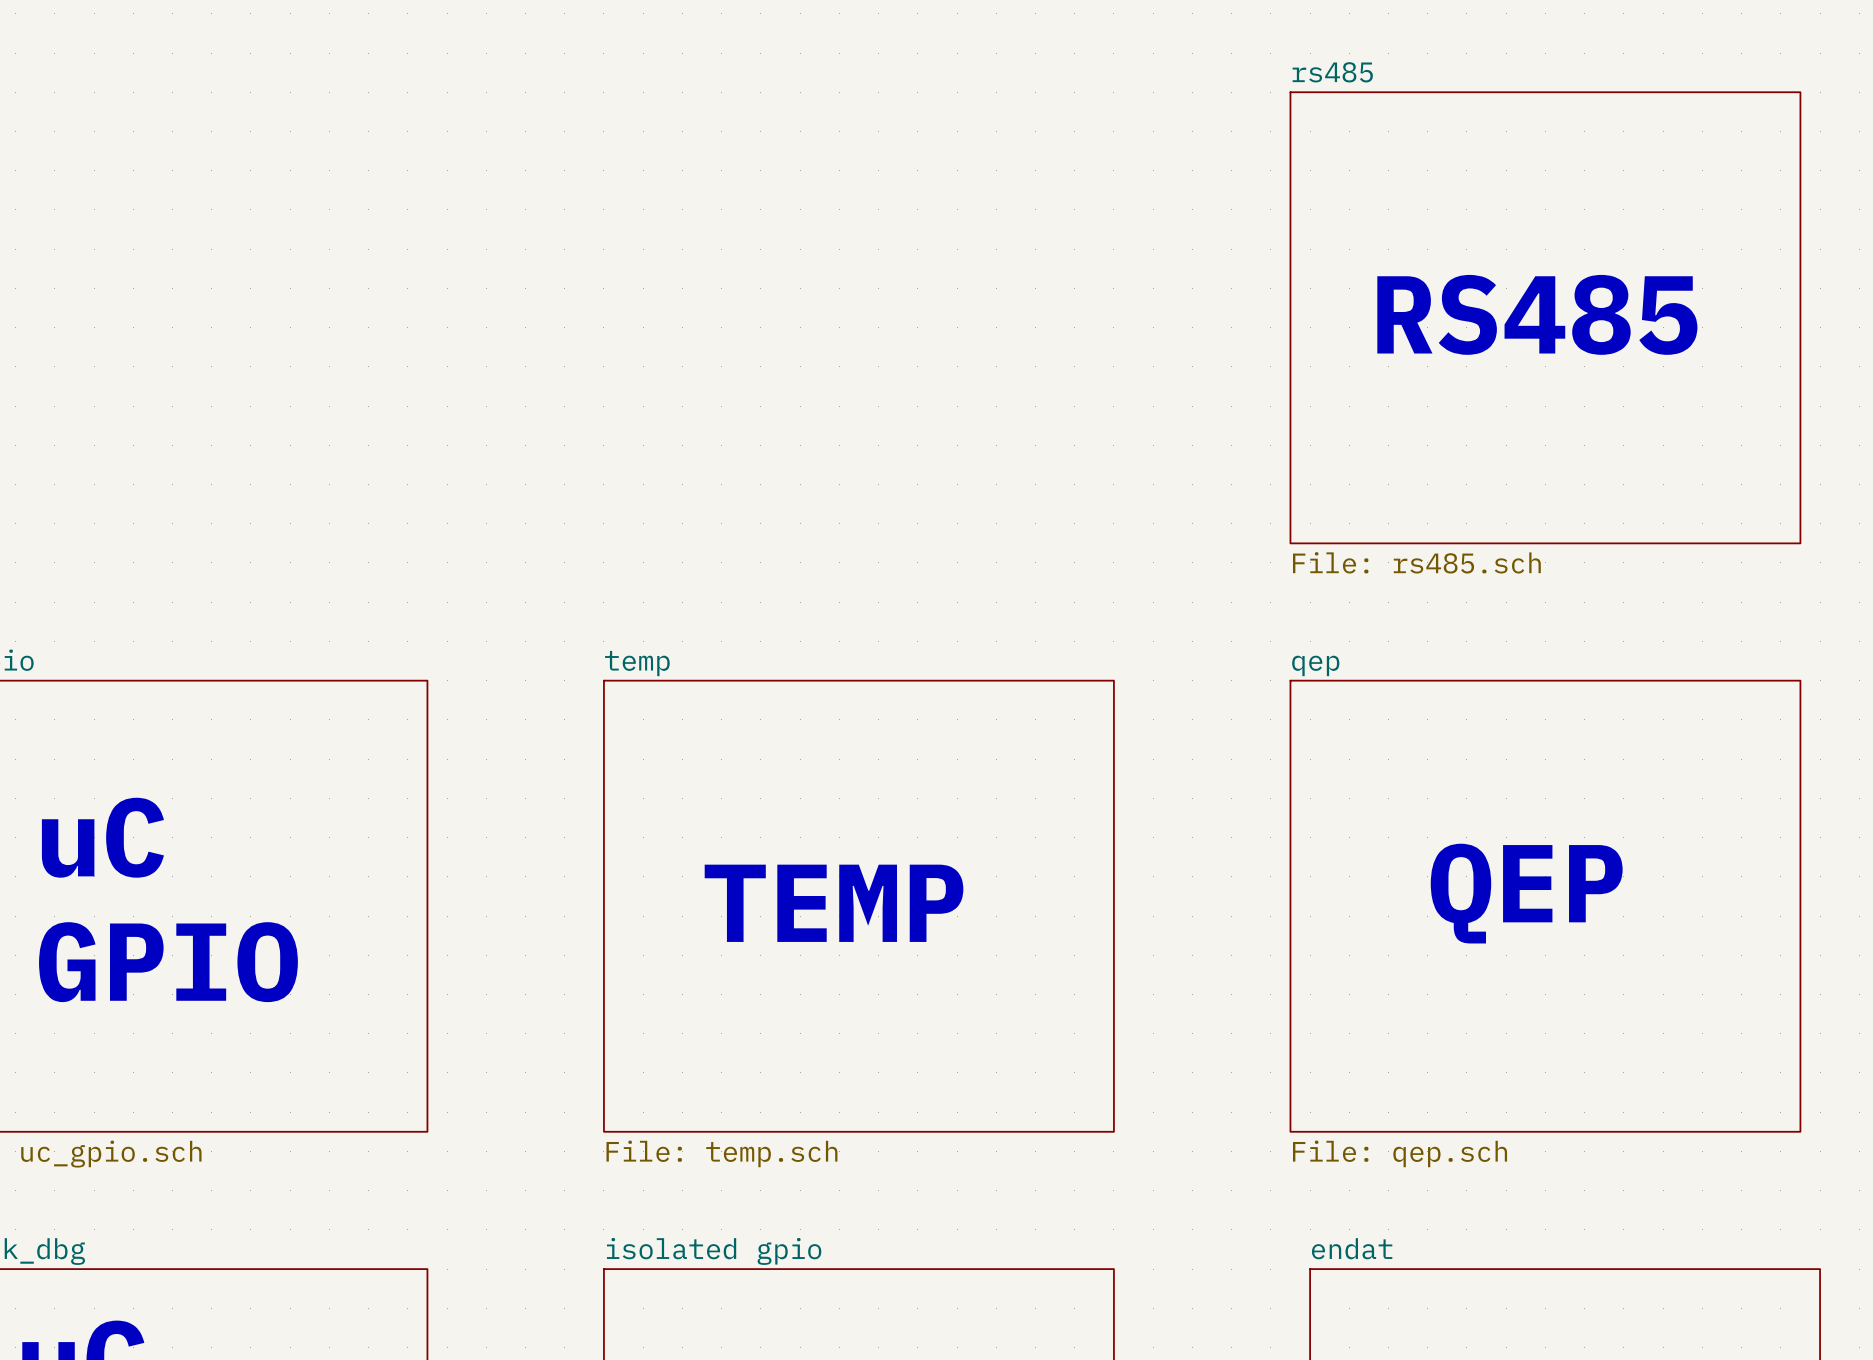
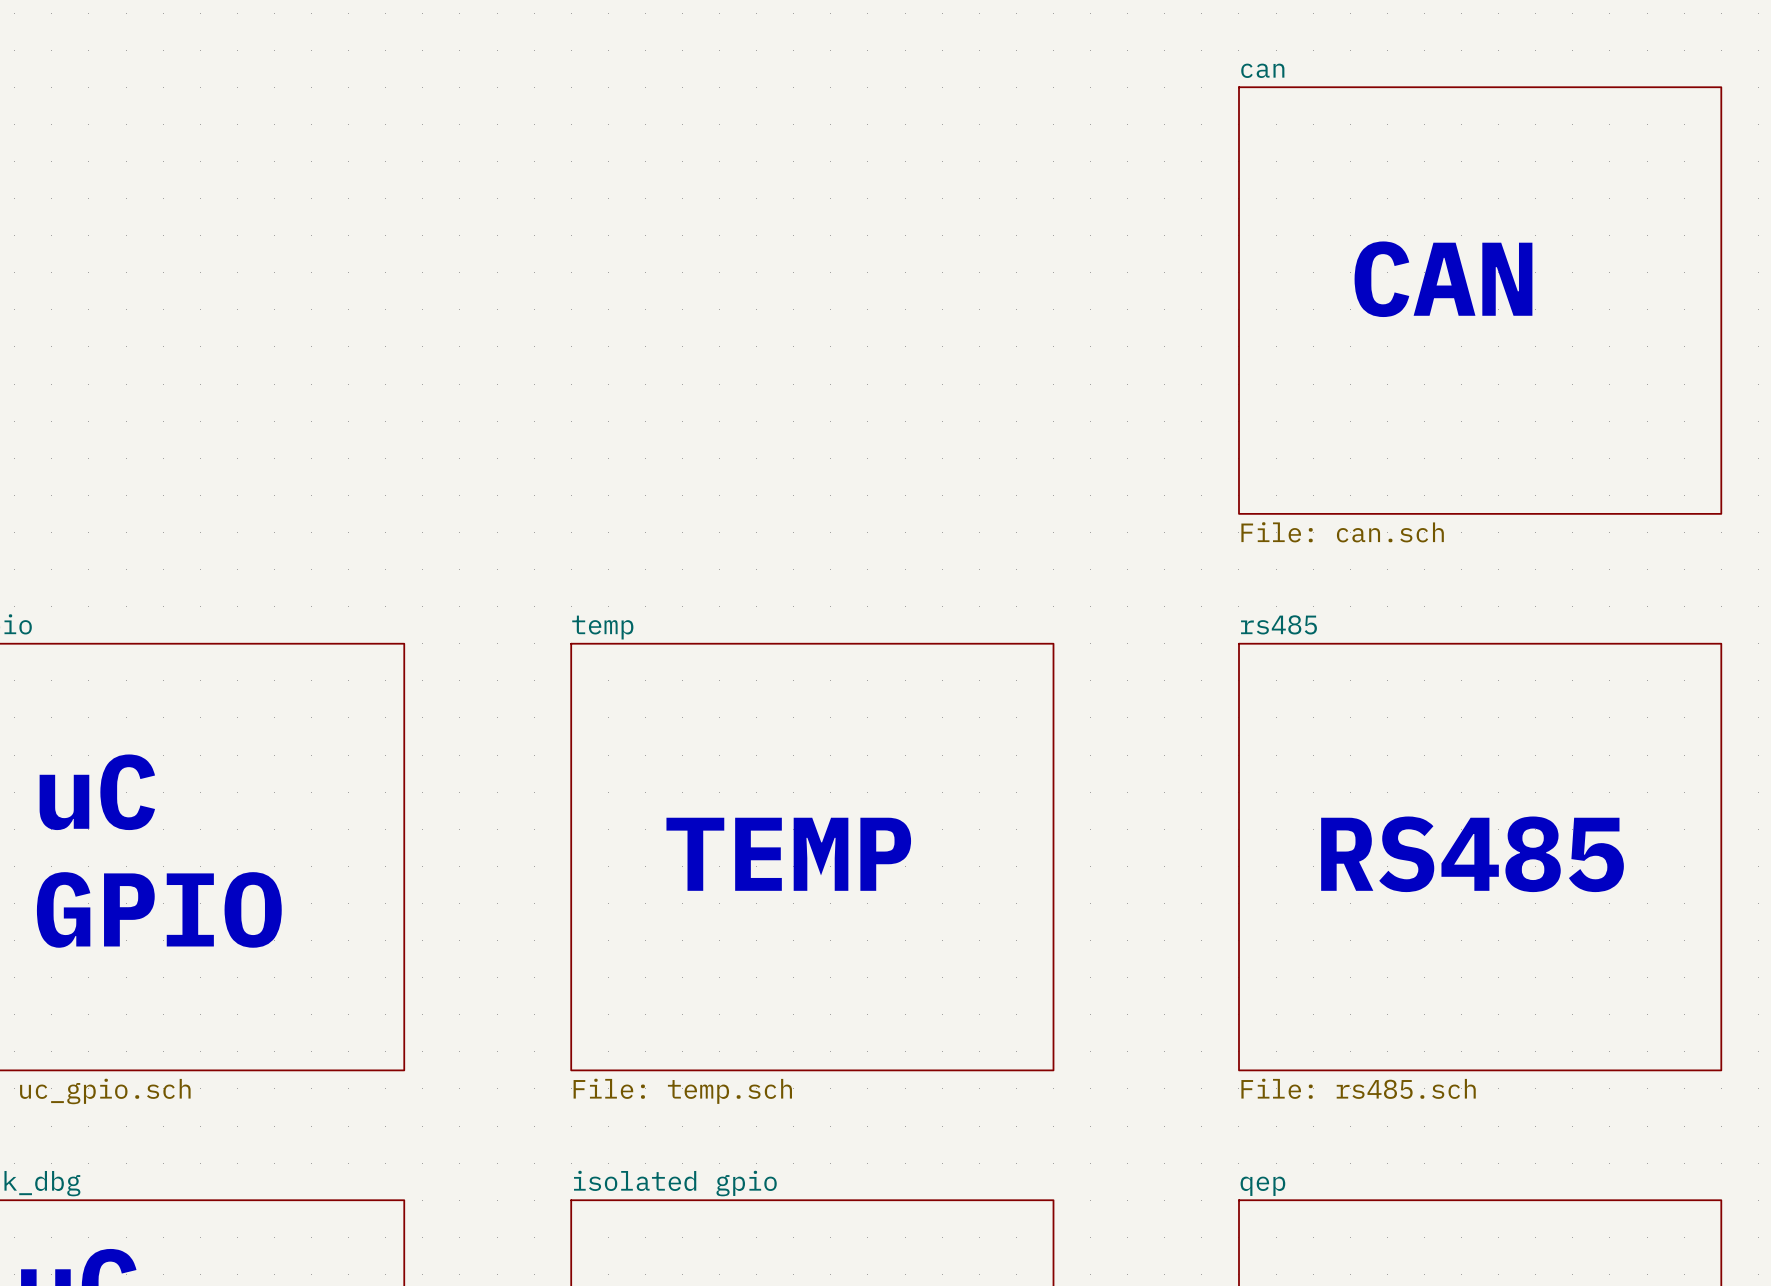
text: none -> CAN (1443, 279)
text: RS485 (1537, 314) -> none
sheet rs485 position: (1545, 317) -> (1480, 857)
sheet can: none -> File: can.sch (1480, 300)
text: QEP (1526, 893) -> none
text: none -> RS485 (1472, 854)
sheet qep: File: qep.sch (1545, 906) -> none
sheet endat name: endat (1352, 1248) -> qep (1262, 1186)

